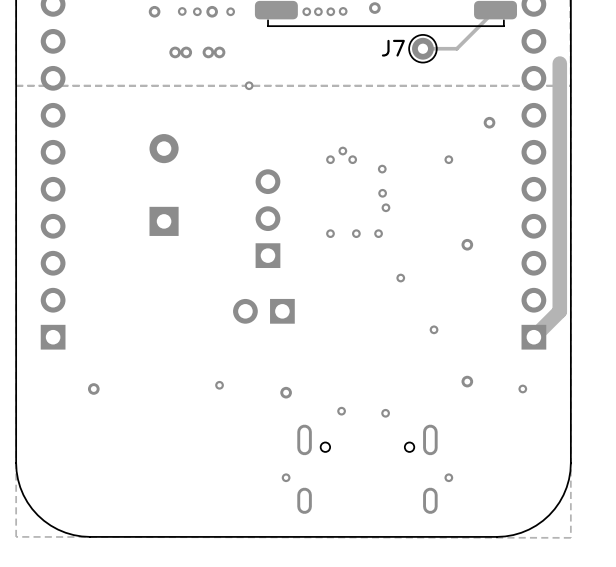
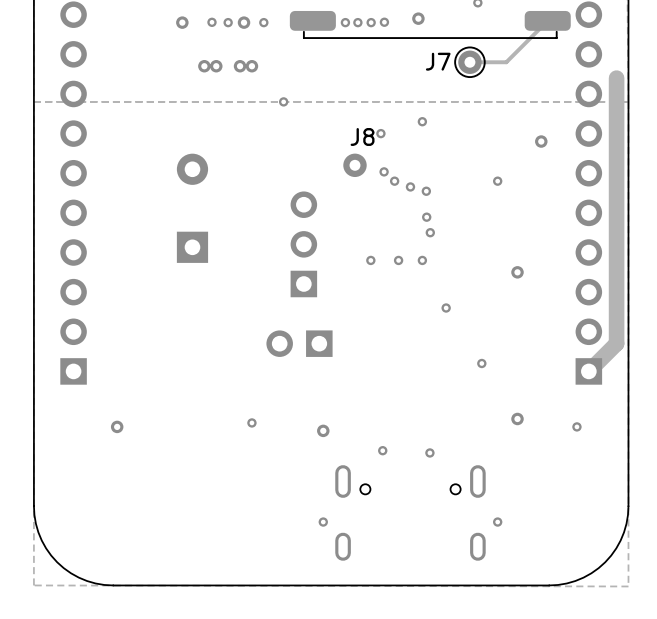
via: none -> (422, 121)
via: none -> (380, 133)
J8: none -> (354, 165)
via: (330, 159) -> none
via: none -> (410, 186)

